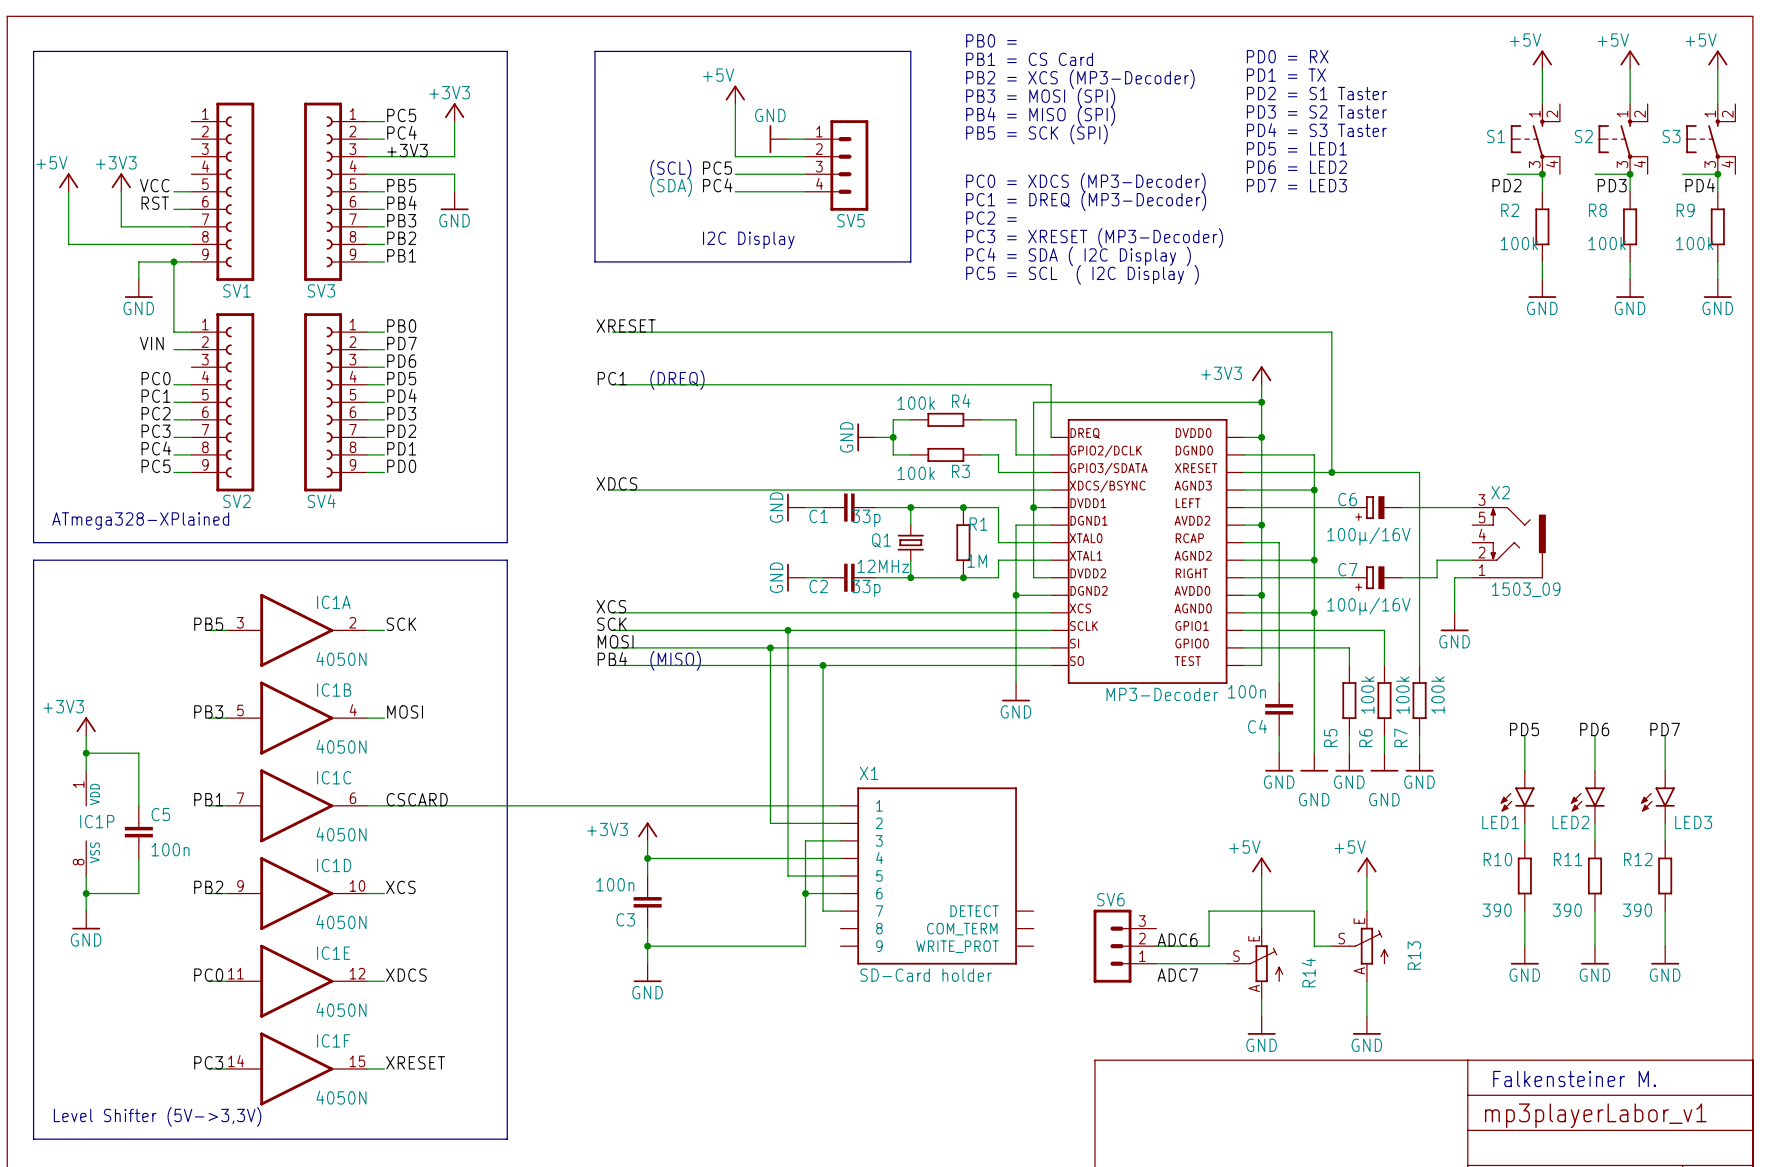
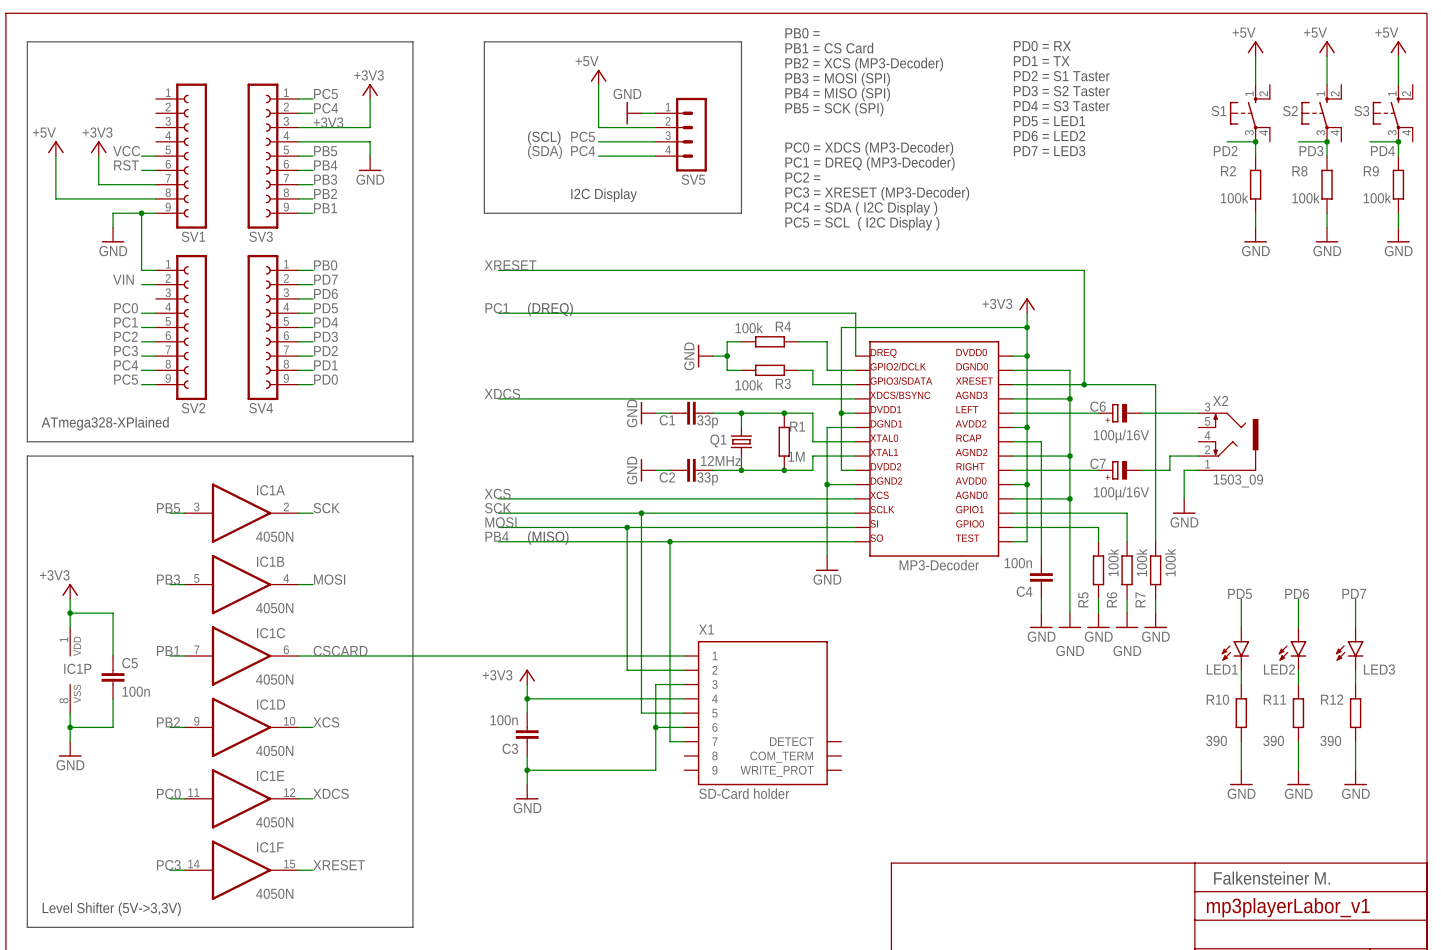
power symbol: +5V (1261, 866) -> none
power symbol: +5V (1366, 866) -> none
wire: (1261, 875) (1261, 928) -> none
wire: (1366, 875) (1366, 911) -> none
label: ADC6 (1177, 940) -> none
SV6: (1124, 946) -> none
wire: (1156, 946) (1209, 946) (1209, 911) (1314, 911) (1314, 946) (1331, 946) -> none
R13: (1360, 946) -> none
wire: (1156, 963) (1226, 963) -> none
R14: (1254, 963) -> none
label: ADC7 (1177, 975) -> none
wire: (1366, 981) (1366, 1016) -> none
wire: (1261, 998) (1261, 1016) -> none
power symbol: GND (1261, 1025) -> none
power symbol: GND (1366, 1025) -> none

